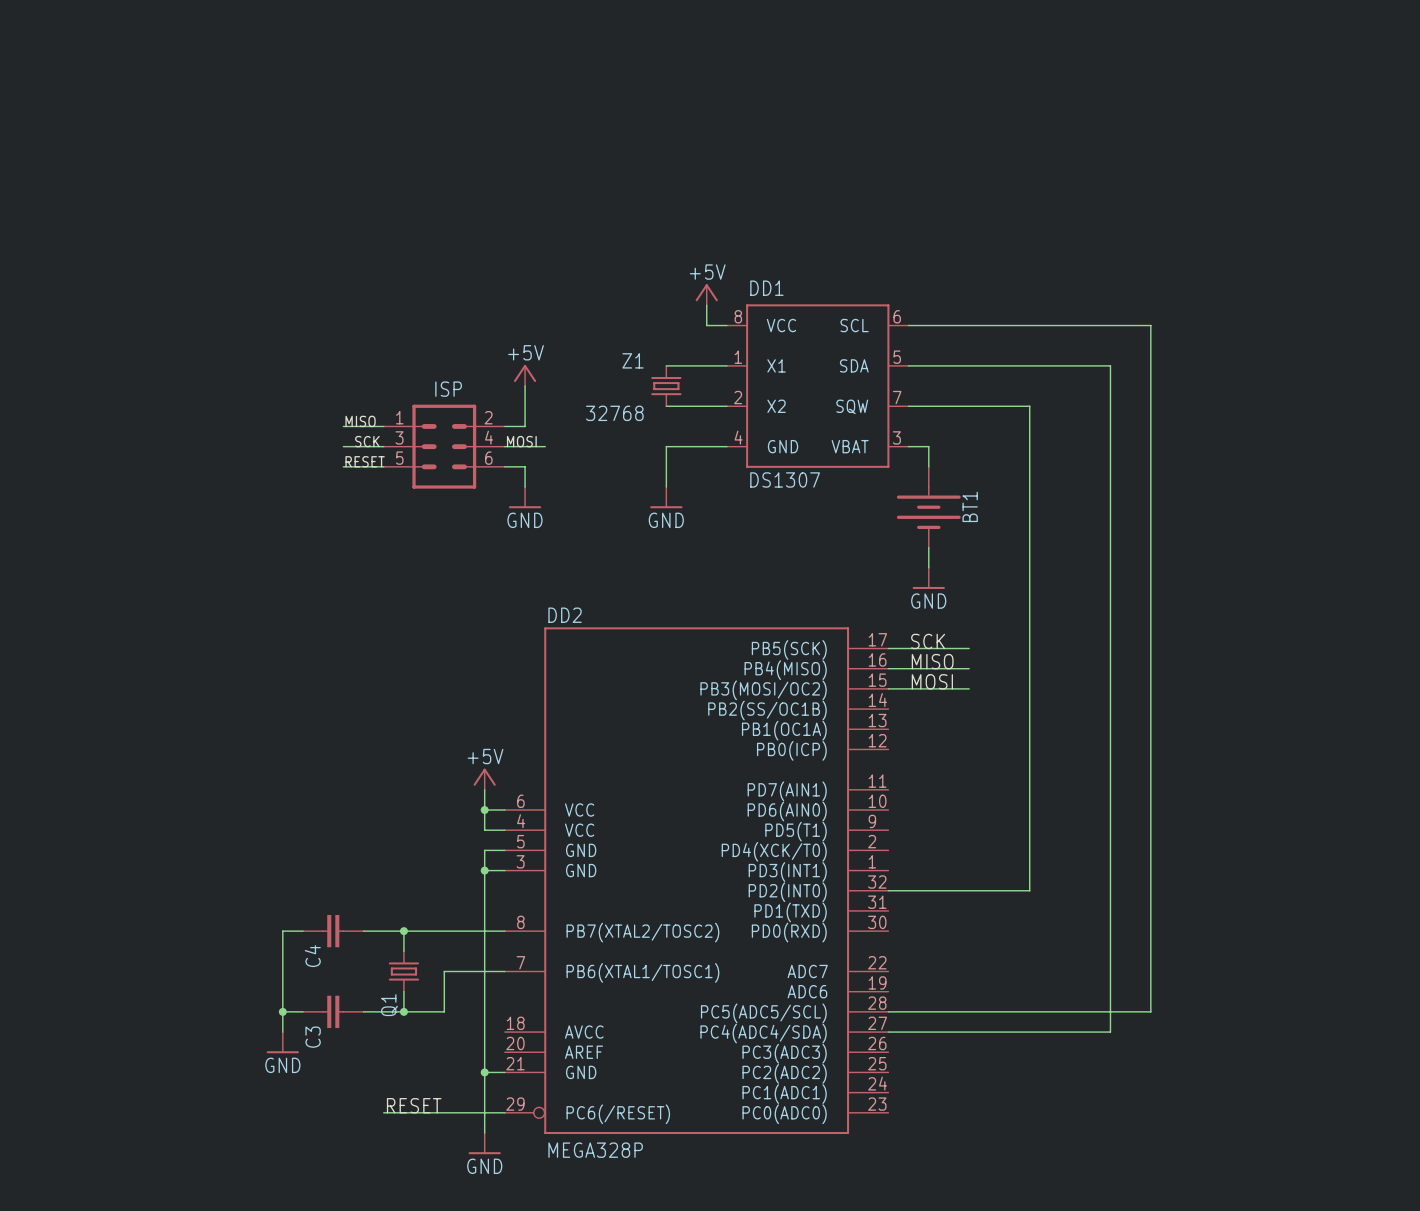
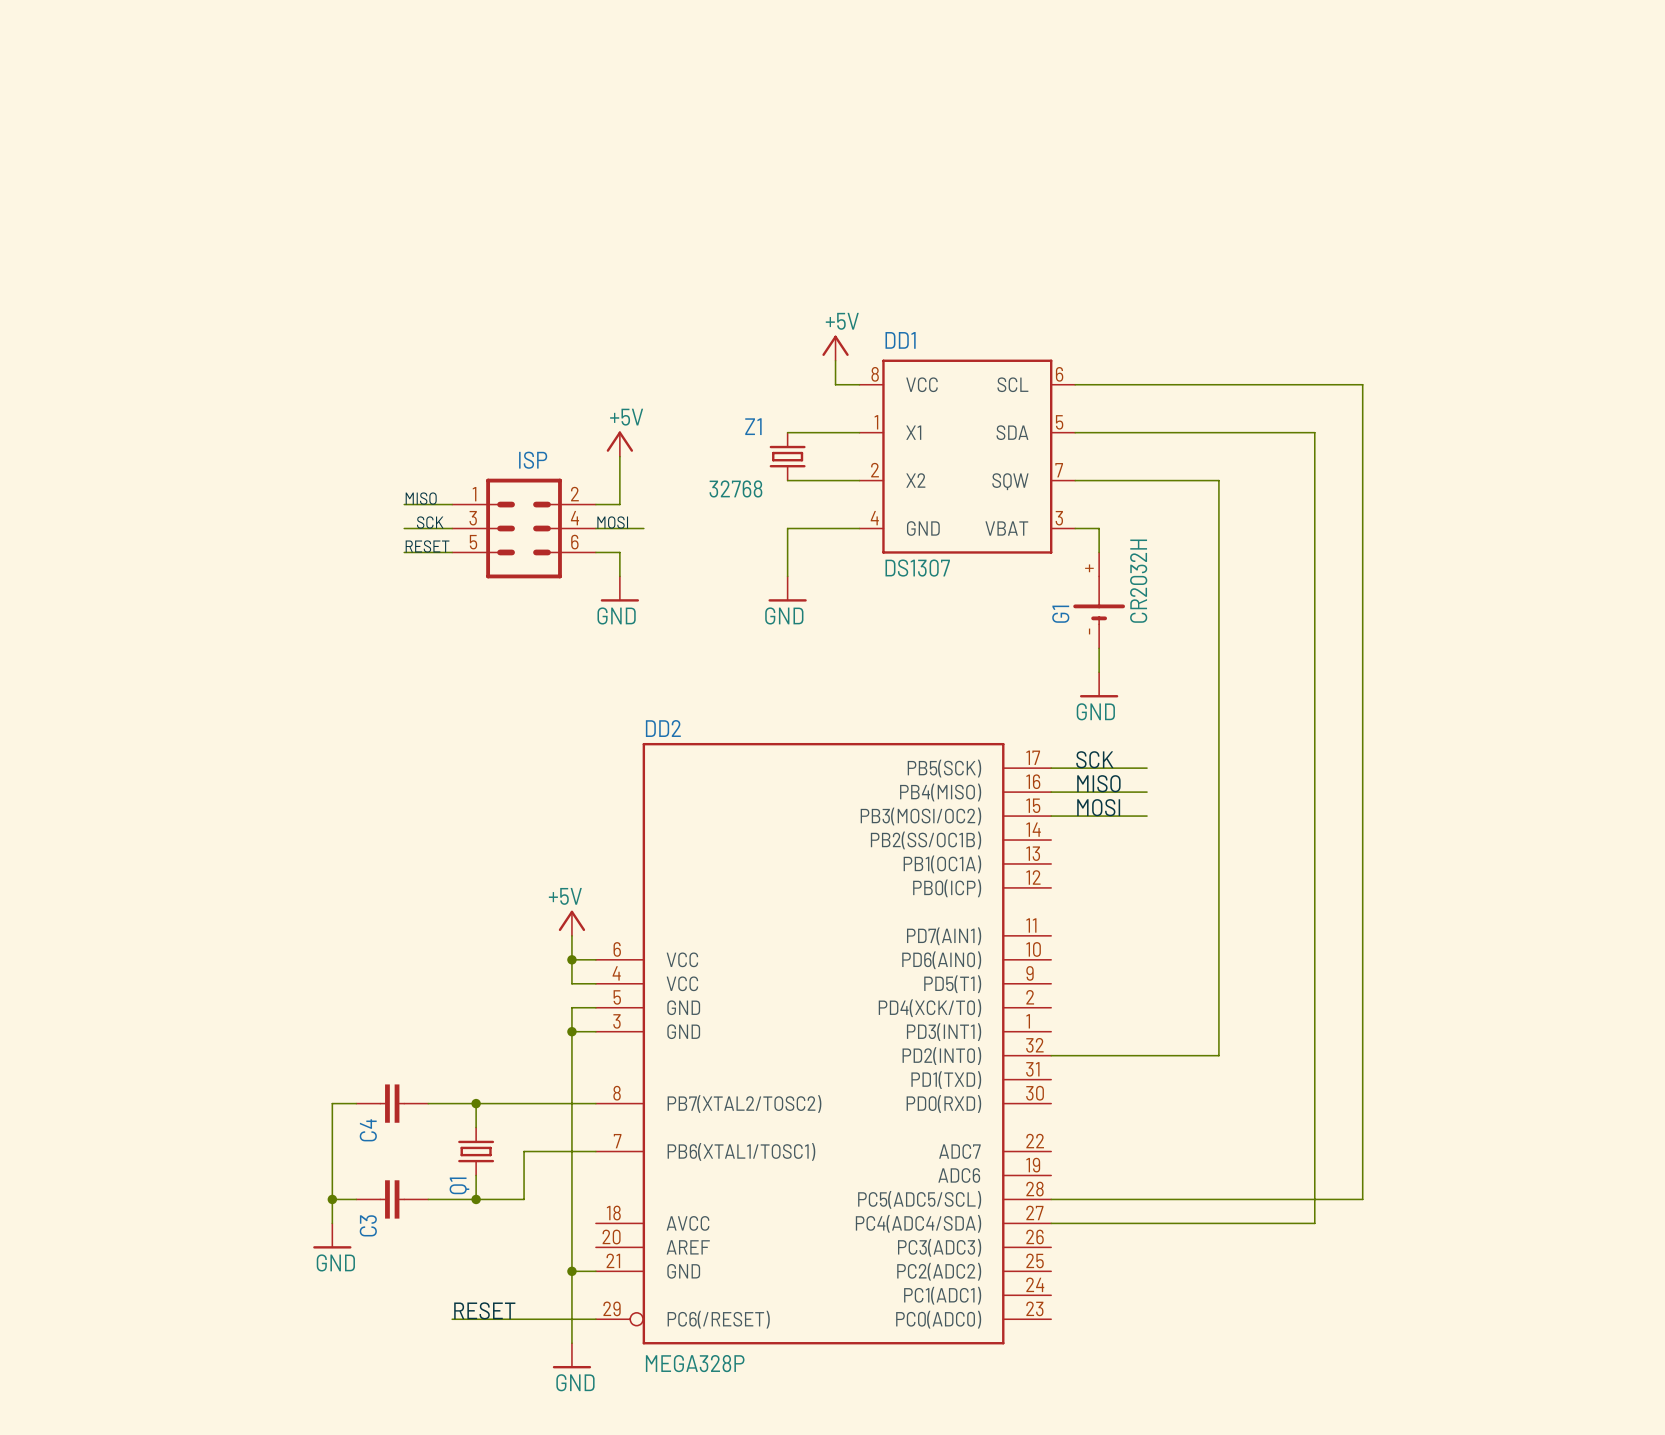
BT1: (928, 507) -> none
G1: none -> CR2032H (1099, 600)

